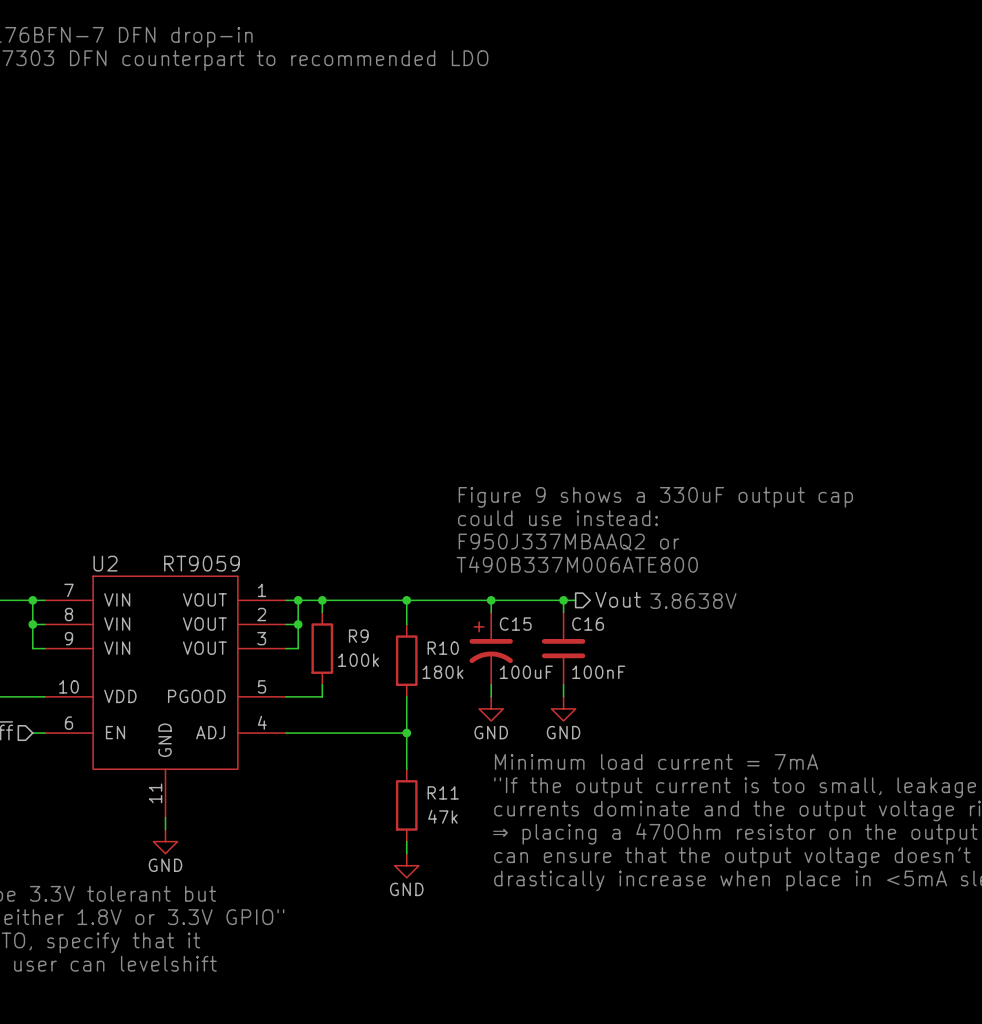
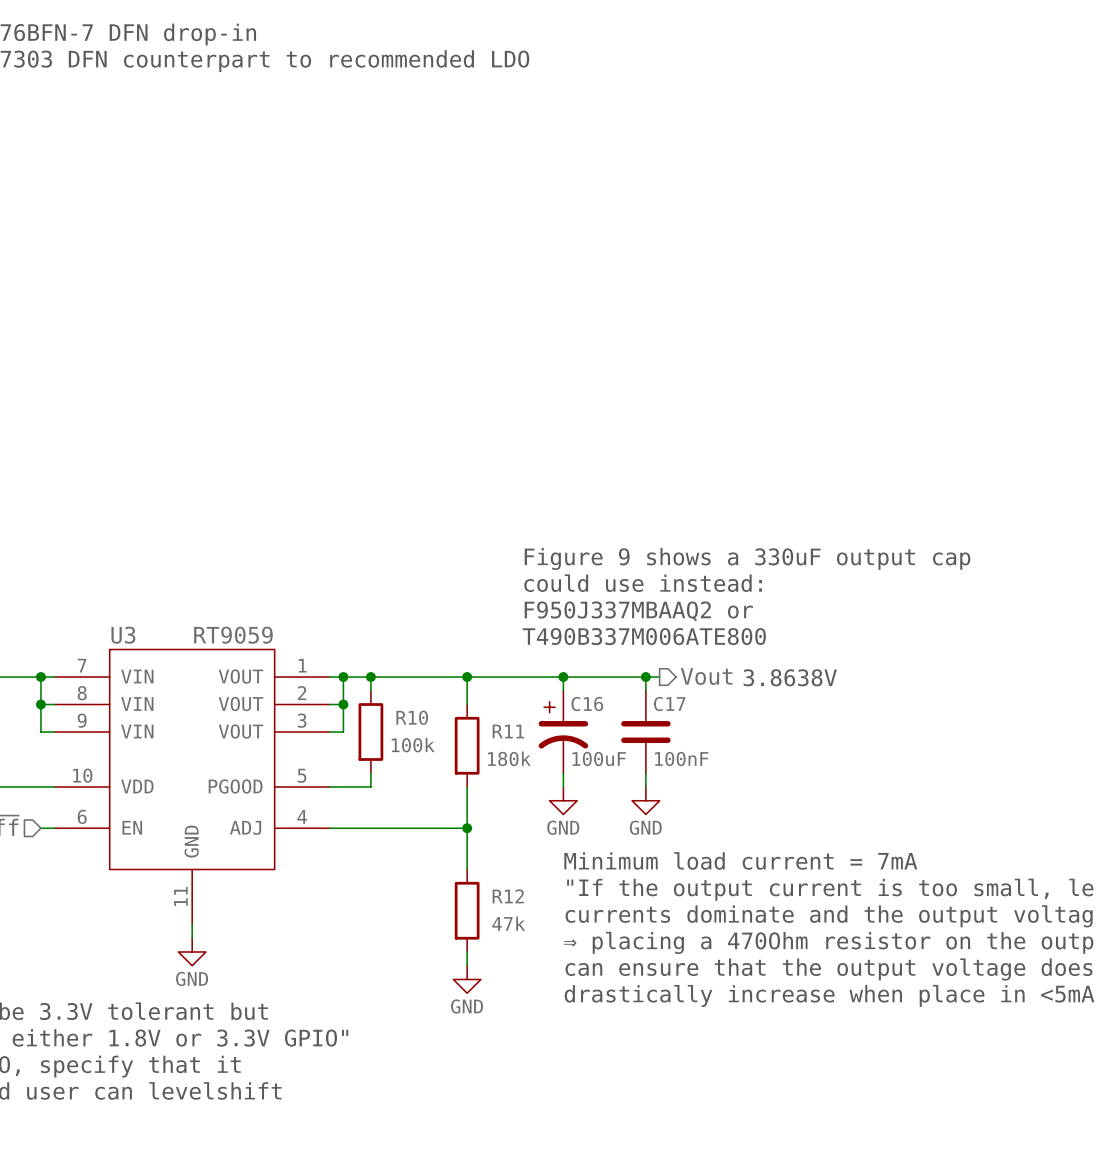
U2 name: U2 (105, 563) -> U3 (123, 635)
C15 name: C15 (515, 624) -> C16 (587, 704)
C16 name: C16 (588, 624) -> C17 (669, 704)
R9 name: R9 (358, 636) -> R10 (412, 717)
R10 name: R10 (443, 648) -> R11 (508, 731)
R11 name: R11 (443, 792) -> R12 (508, 896)

